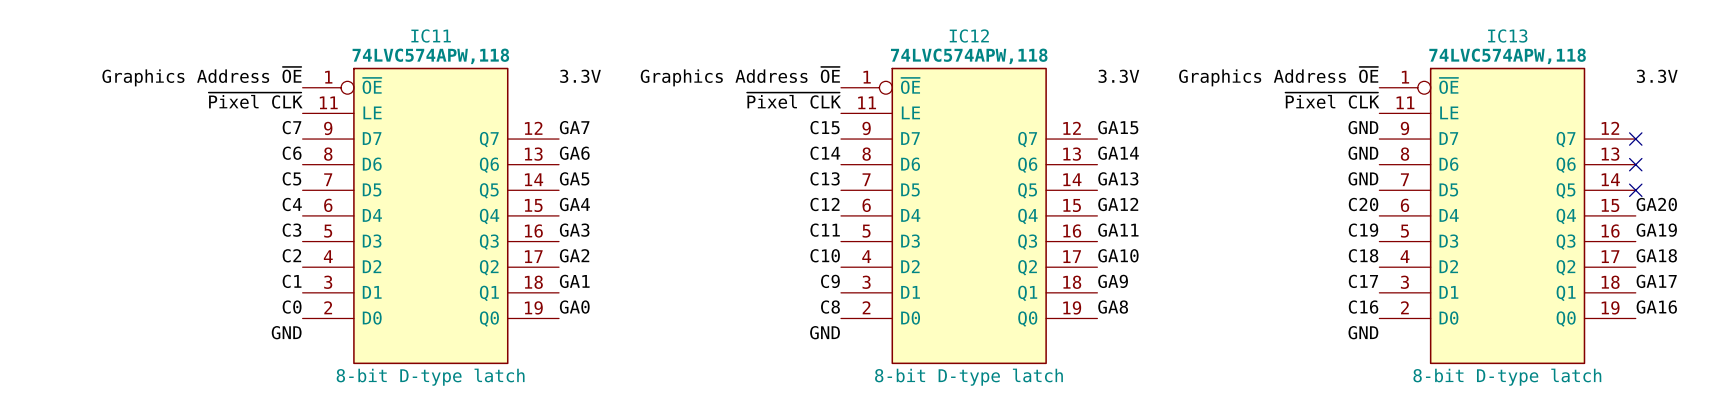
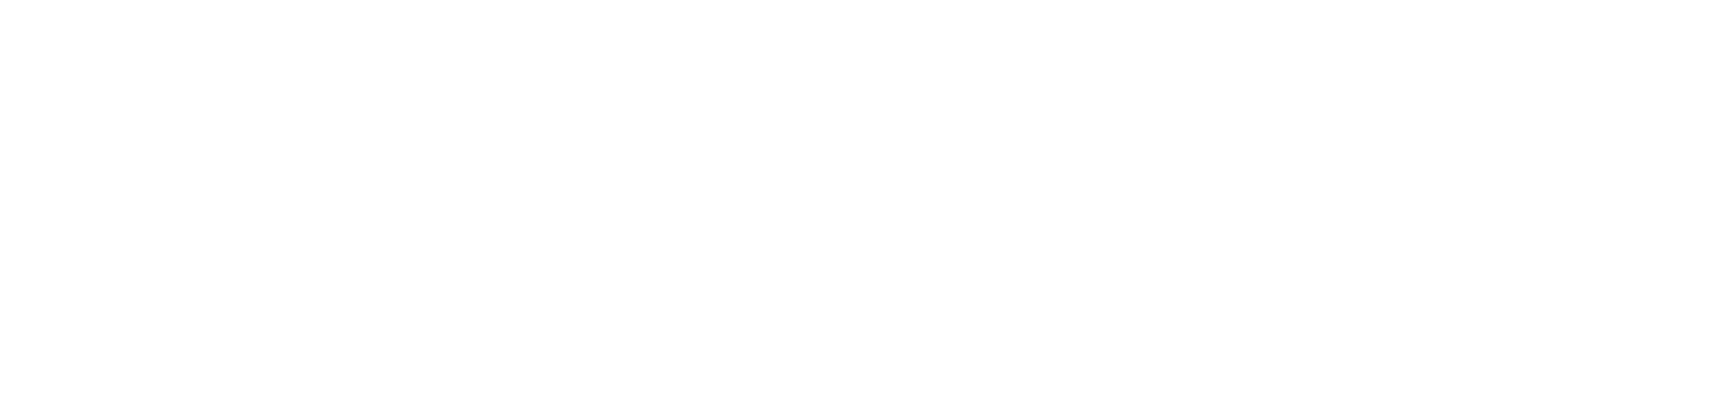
label: Graphics Address ~{OE} (201, 76) -> none
label: 3.3V (580, 76) -> none
label: Graphics Address ~{OE} (740, 76) -> none
label: 3.3V (1118, 76) -> none
label: Graphics Address ~{OE} (1278, 76) -> none
label: 3.3V (1657, 76) -> none
label: ~{Pixel CLK} (255, 100) -> none
label: ~{Pixel CLK} (793, 100) -> none
label: ~{Pixel CLK} (1332, 100) -> none
label: C7 (292, 127) -> none
label: GA7 (574, 127) -> none
label: C15 (825, 127) -> none
label: GA15 (1118, 127) -> none
label: GND (1363, 127) -> none
no-connect mark: (1635, 139) -> none
label: C6 (292, 153) -> none
label: GA6 (574, 153) -> none
label: C14 (825, 153) -> none
label: GA14 (1118, 153) -> none
label: GND (1363, 153) -> none
no-connect mark: (1635, 164) -> none
label: C5 (291, 178) -> none
label: GA5 (574, 178) -> none
label: C13 (825, 178) -> none
label: GA13 (1118, 178) -> none
label: GND (1363, 178) -> none
no-connect mark: (1635, 190) -> none
label: C4 (292, 204) -> none
label: GA4 (574, 204) -> none
label: C12 (824, 204) -> none
label: GA12 (1118, 204) -> none
label: C20 (1363, 204) -> none
label: GA20 (1656, 204) -> none
IC11: 74LVC574APW,118 (430, 215) -> none
IC12: 74LVC574APW,118 (969, 215) -> none
IC13: 74LVC574APW,118 (1507, 215) -> none
label: C3 (292, 230) -> none
label: GA3 (574, 230) -> none
label: C11 (825, 230) -> none
label: GA11 (1118, 230) -> none
label: C19 (1363, 230) -> none
label: GA19 (1656, 230) -> none
label: C2 (291, 255) -> none
label: GA2 (574, 255) -> none
label: C10 (825, 255) -> none
label: GA10 (1118, 255) -> none
label: C18 (1363, 255) -> none
label: GA18 (1656, 255) -> none
label: C1 (292, 281) -> none
label: GA1 (574, 281) -> none
label: C9 (830, 281) -> none
label: GA9 (1113, 281) -> none
label: C17 (1363, 281) -> none
label: GA17 (1656, 281) -> none
label: C0 (292, 307) -> none
label: GA0 (574, 307) -> none
label: C8 (830, 307) -> none
label: GA8 (1113, 307) -> none
label: C16 (1363, 307) -> none
label: GA16 (1656, 307) -> none
label: GND (286, 332) -> none
label: GND (825, 332) -> none
label: GND (1363, 332) -> none

